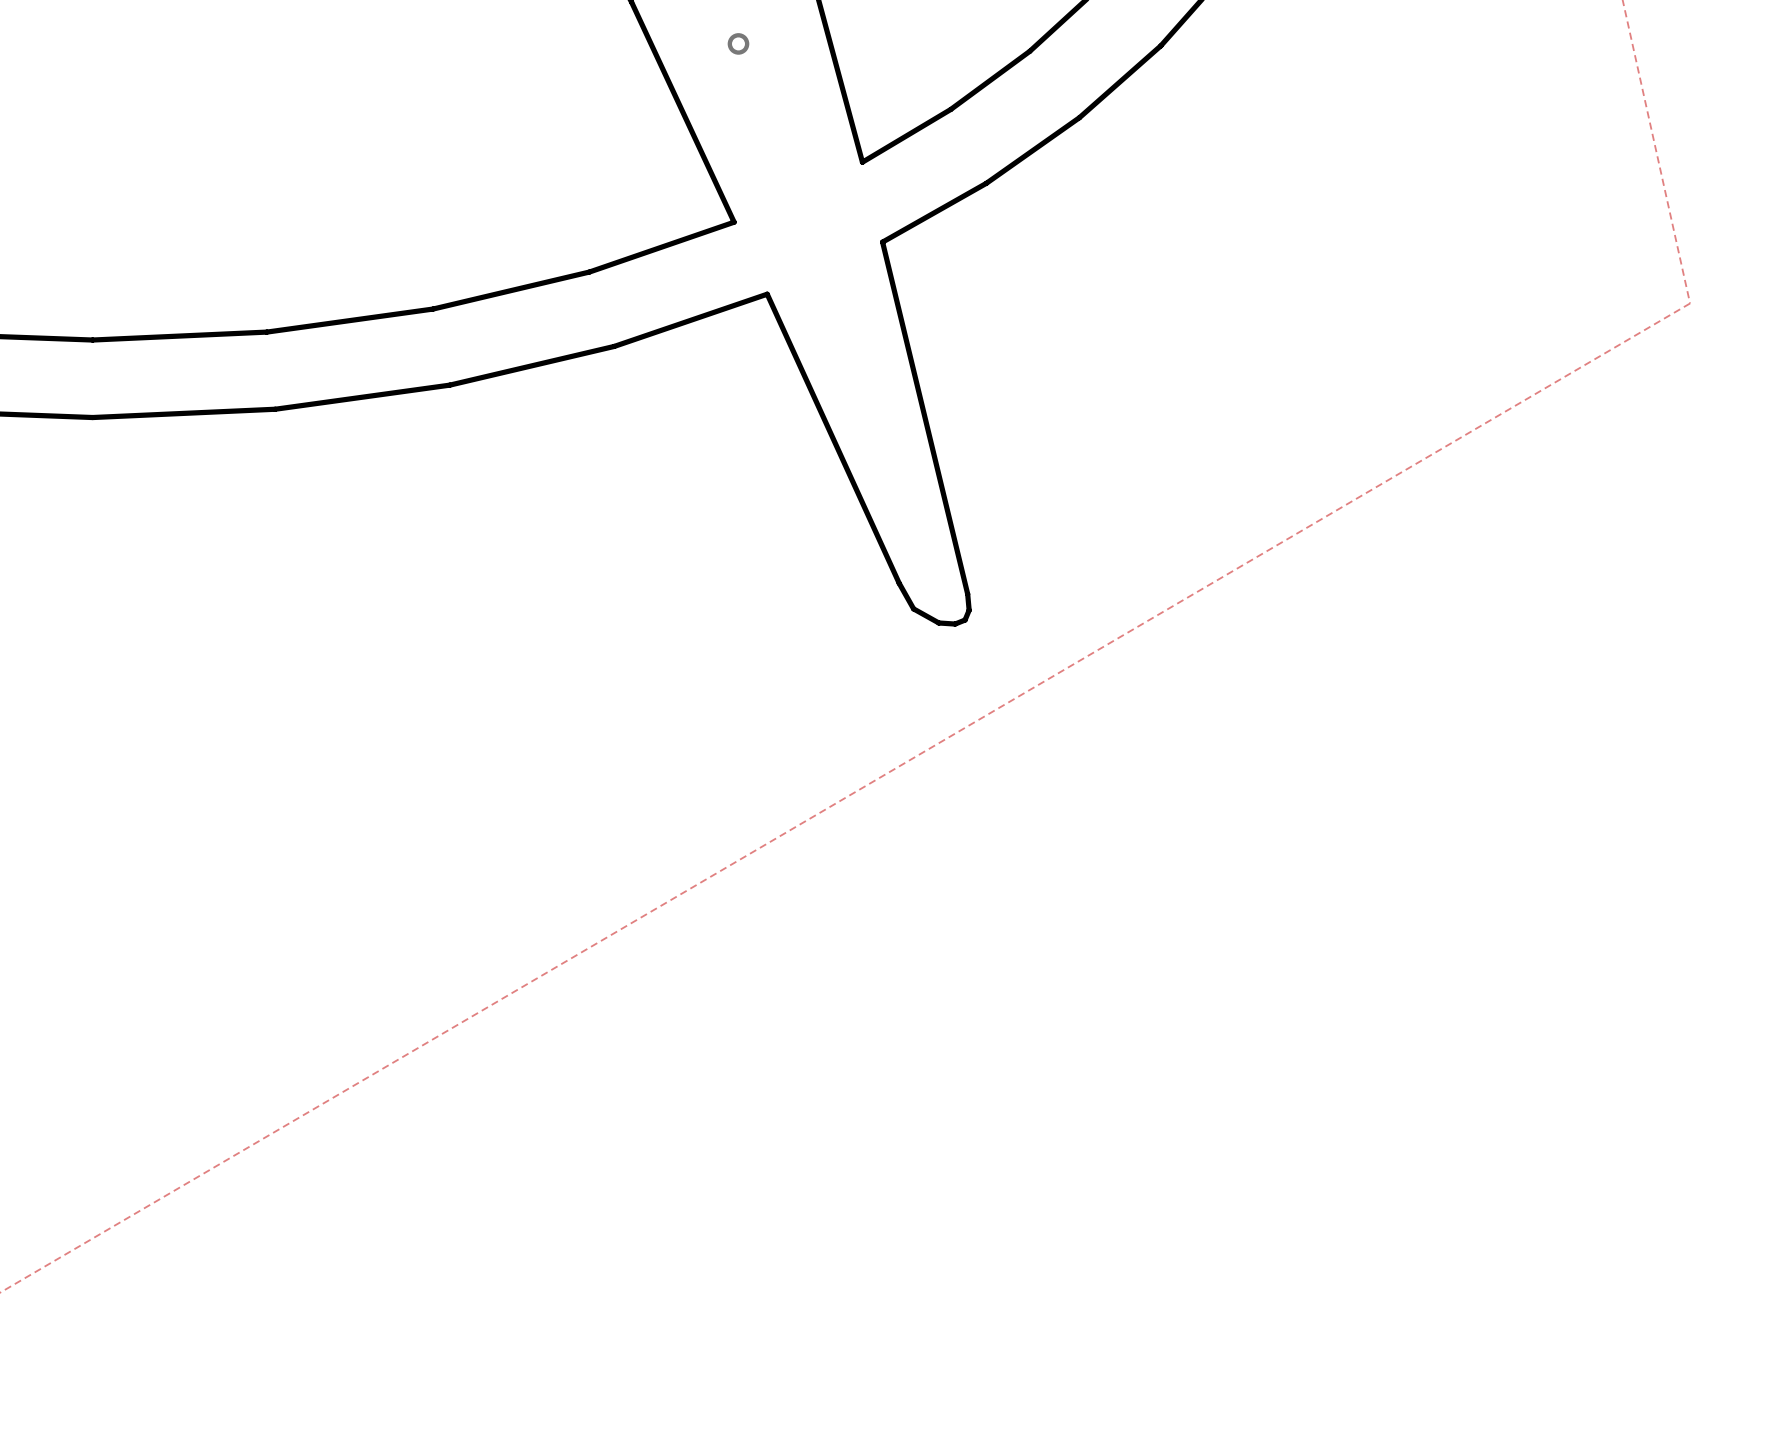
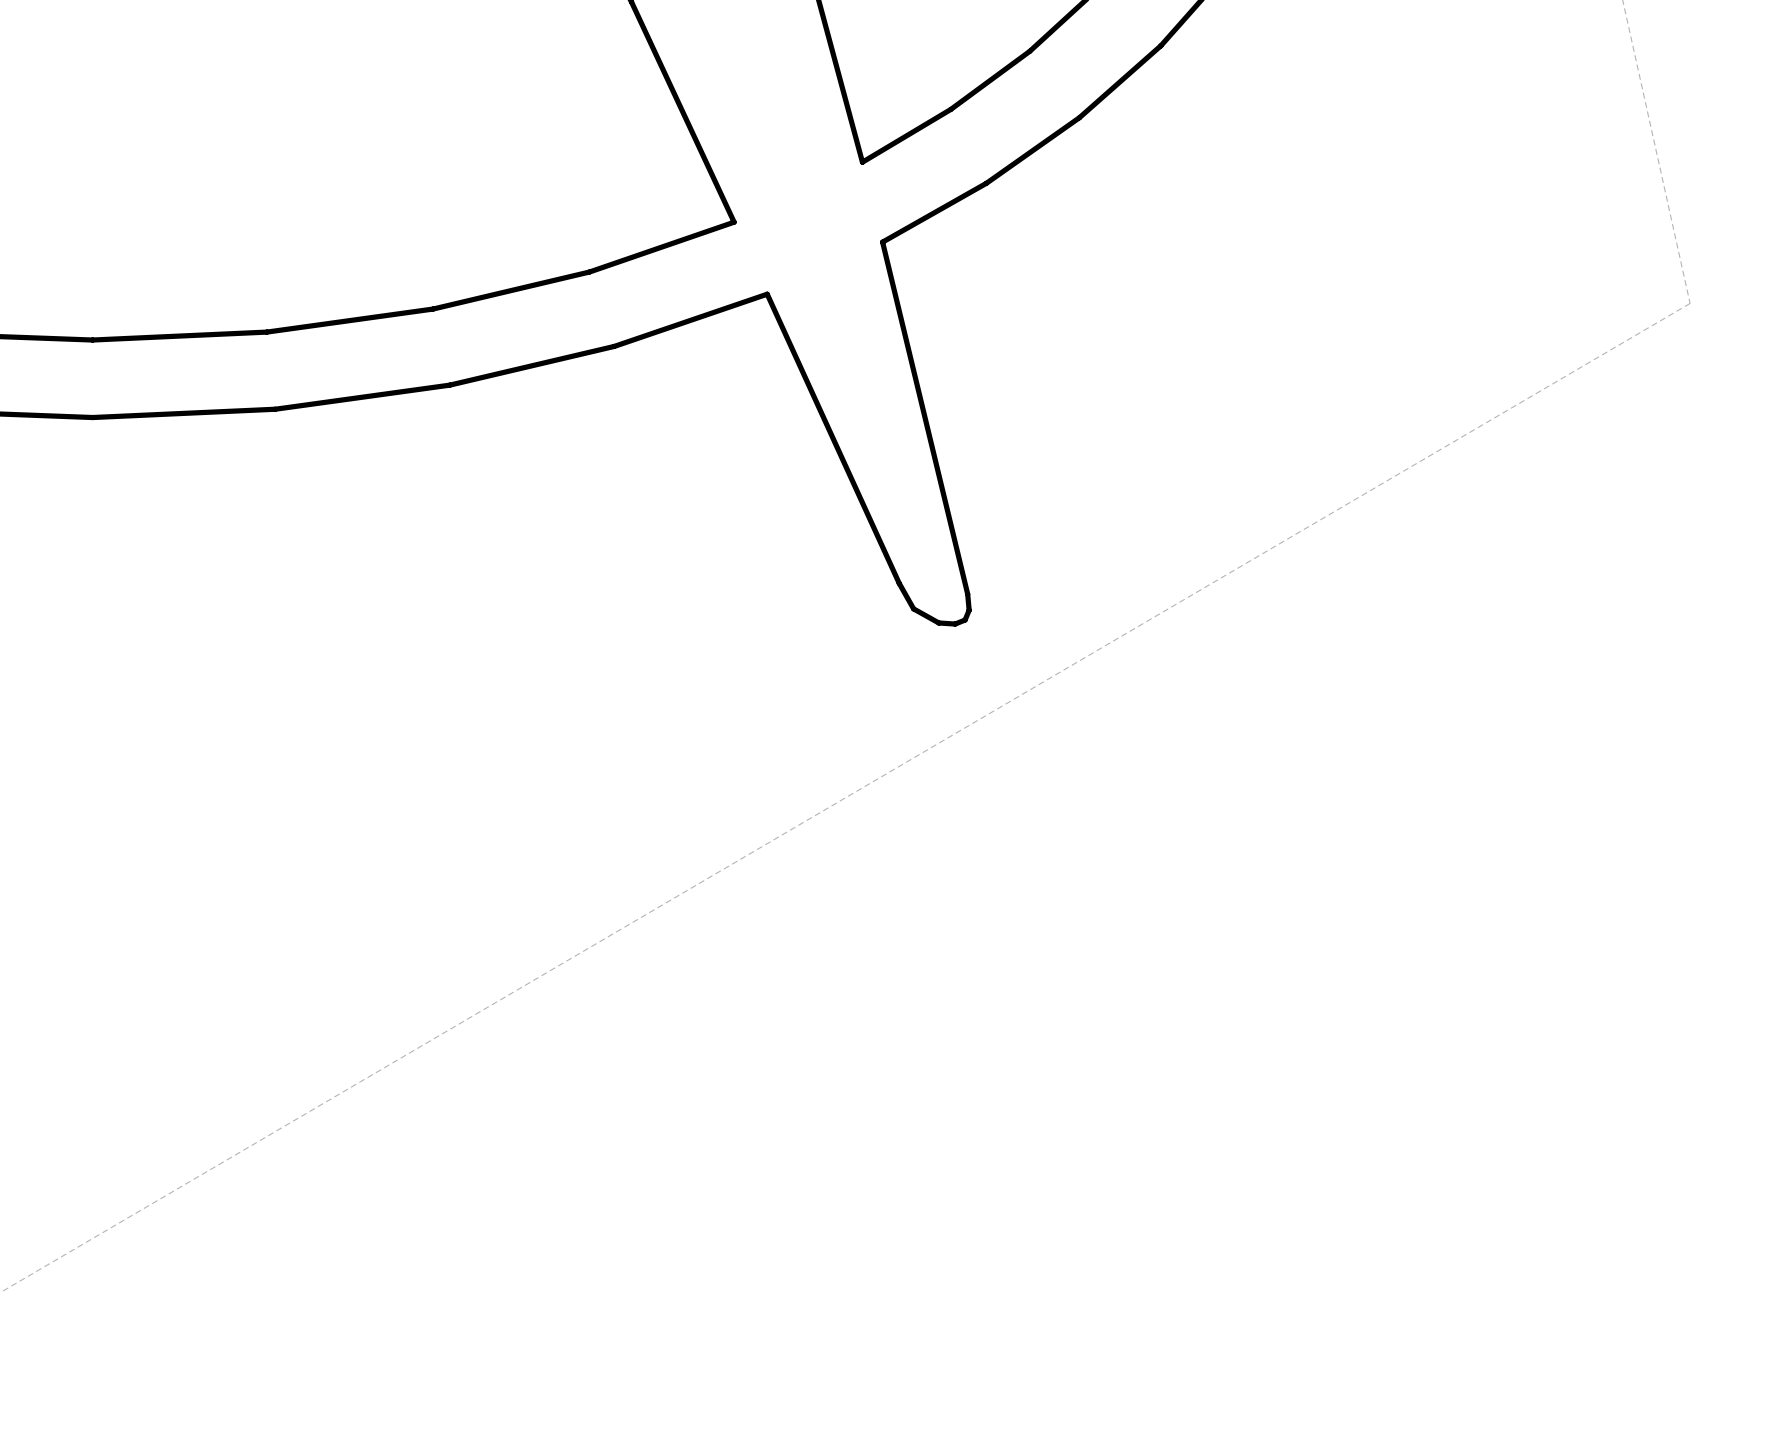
via: (738, 43) -> none

